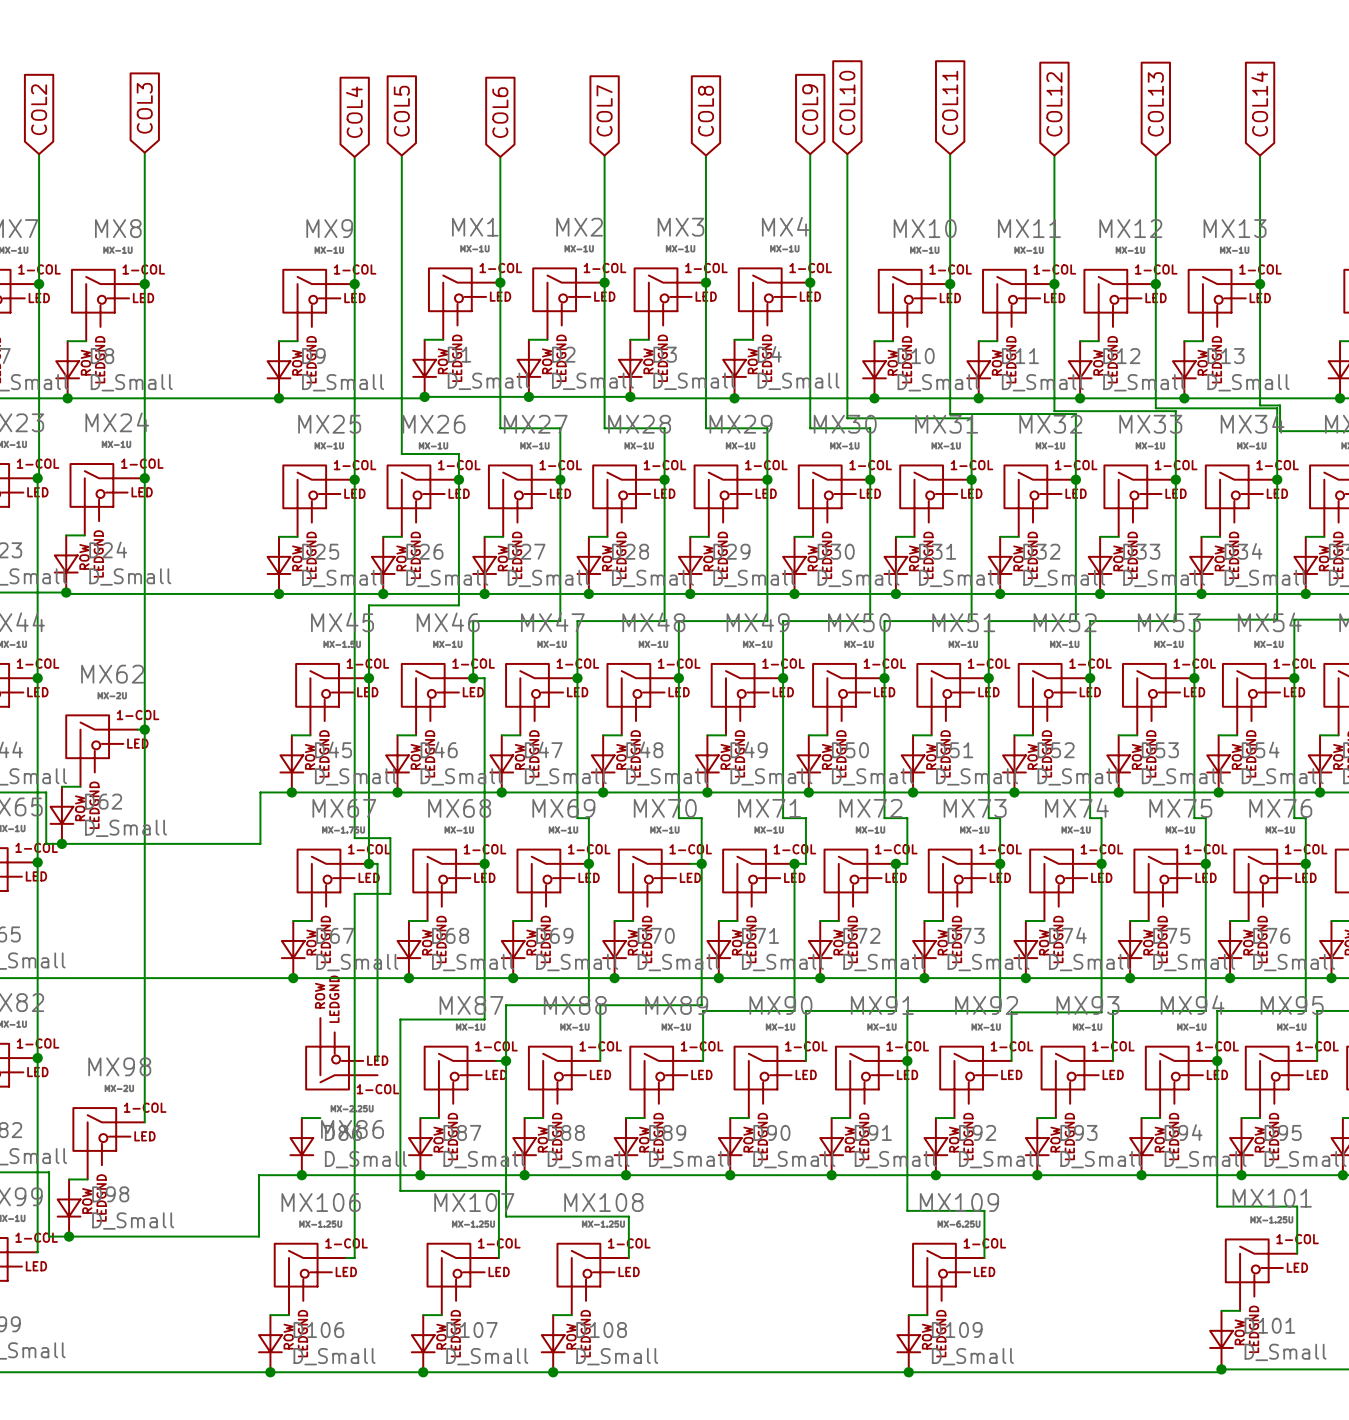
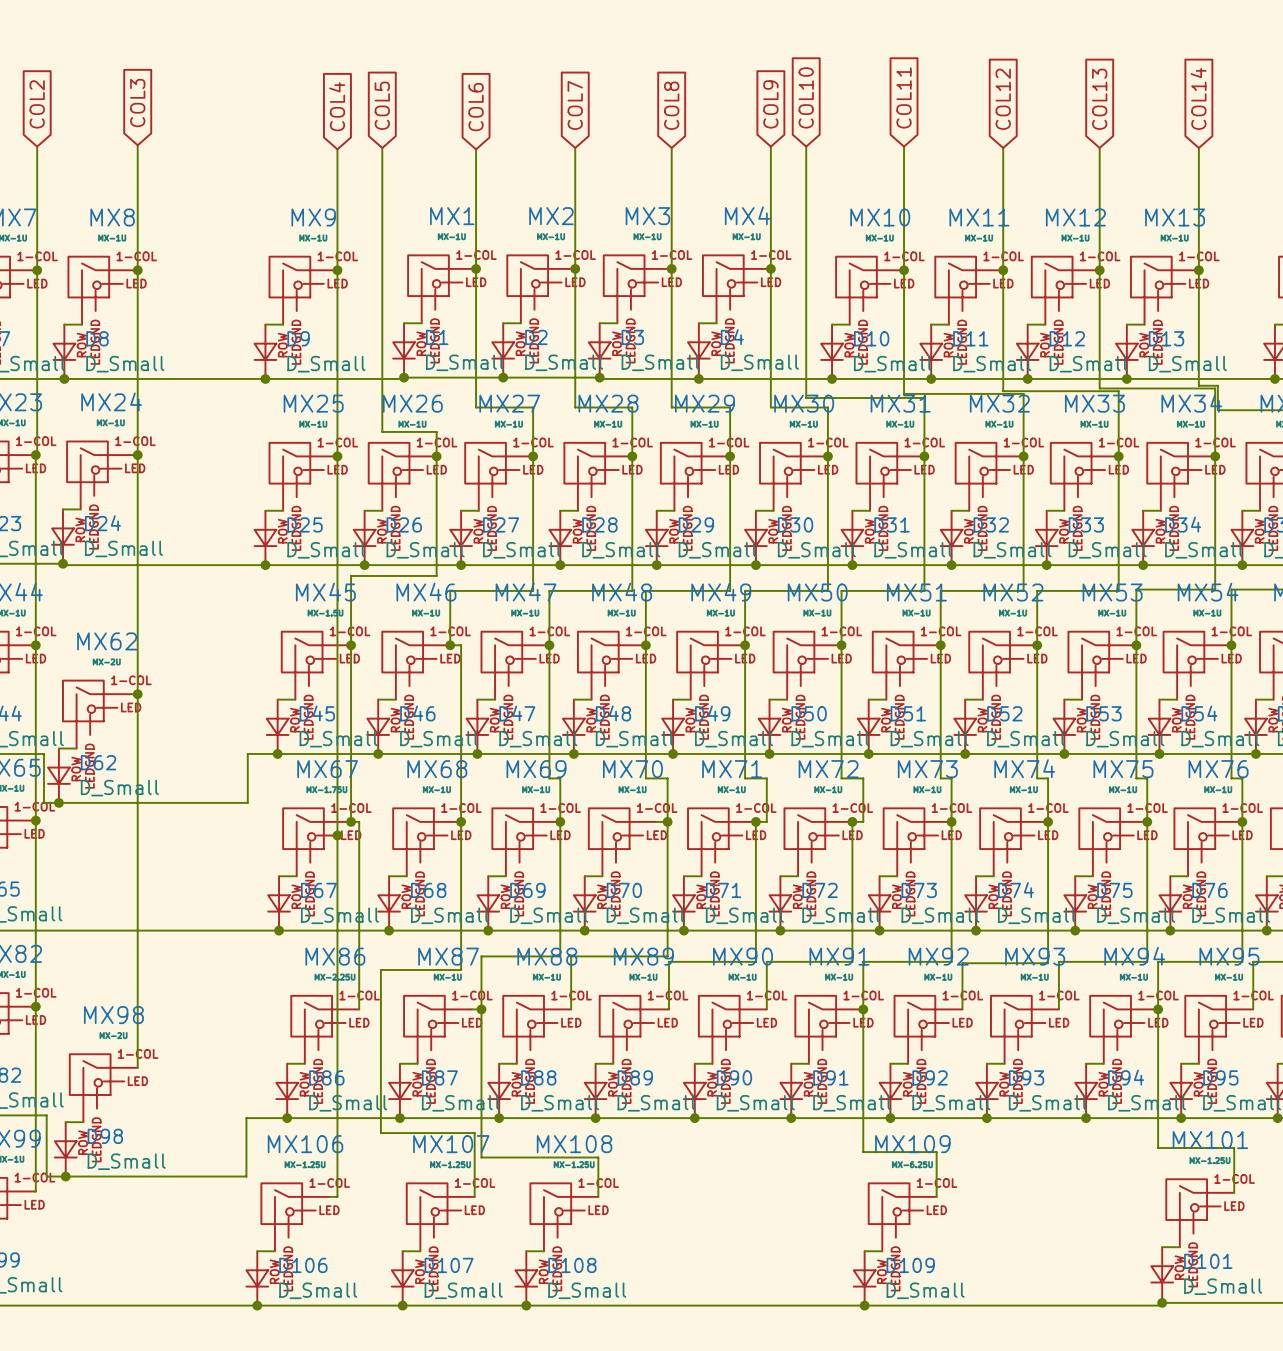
wire: (354, 838) (390, 838) (390, 893) (354, 893) -> (337, 797) (337, 850)
junction: none -> (337, 835)
MX86 flip: as is (327, 1068) -> up-down (311, 1016)

